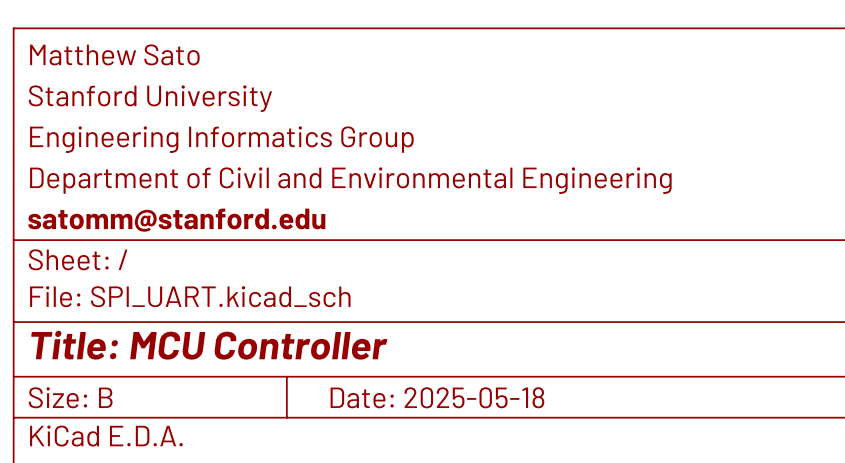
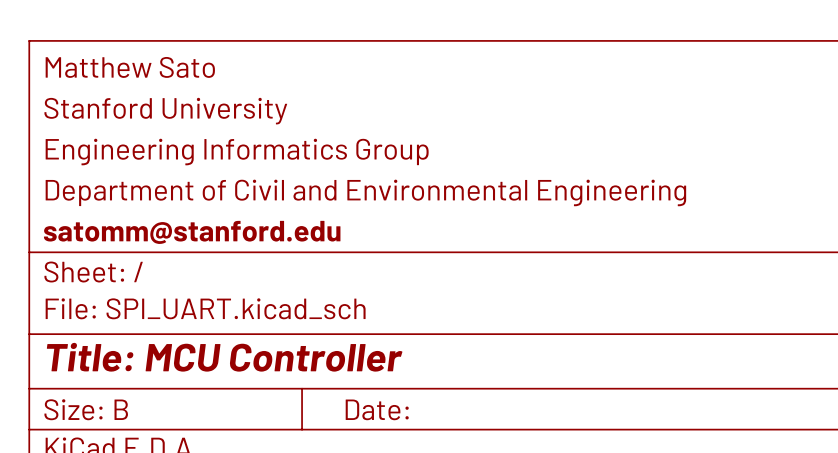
title block: Date: 2025-05-18 (437, 397) -> Date: (377, 409)

